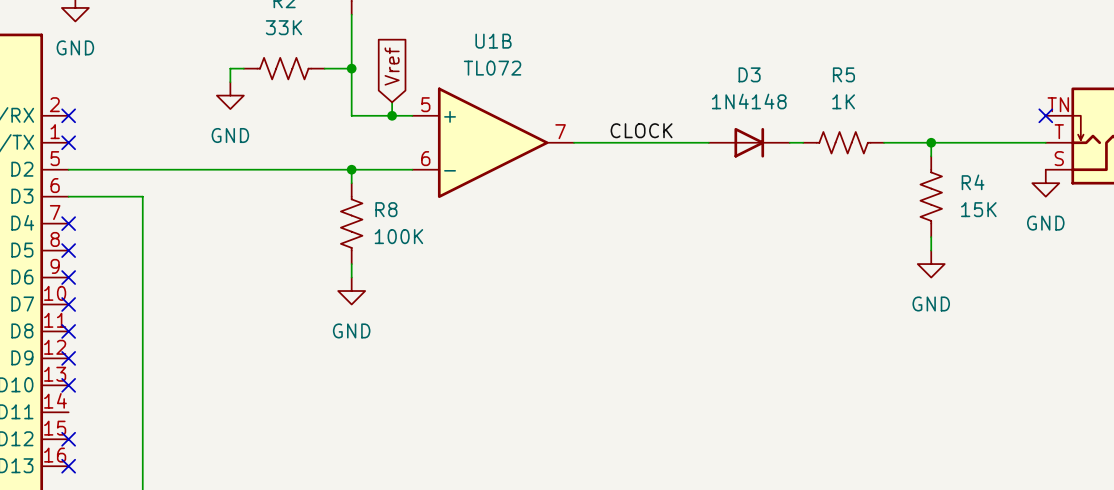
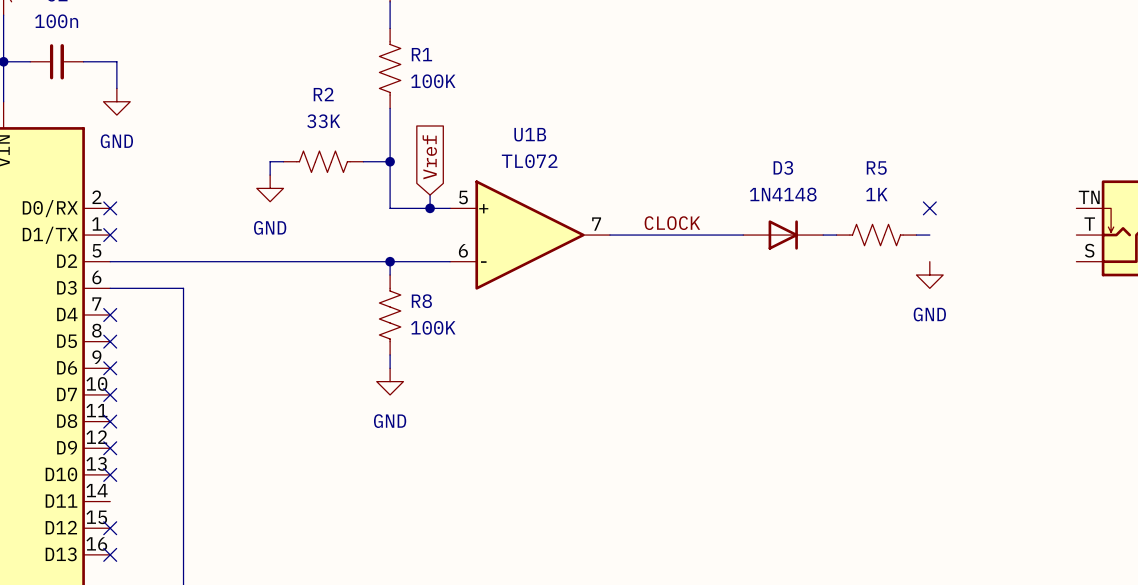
no-connect mark: none -> (929, 208)
no-connect mark: (1045, 115) -> none
wire: (897, 142) (1045, 142) -> none
wire: (931, 142) (931, 156) -> none
junction: (931, 142) -> none
power symbol: none -> GND (929, 275)
power symbol: GND (1045, 183) -> none
R4: 15K (931, 196) -> none
wire: (931, 237) (931, 250) -> none
power symbol: GND (931, 264) -> none

